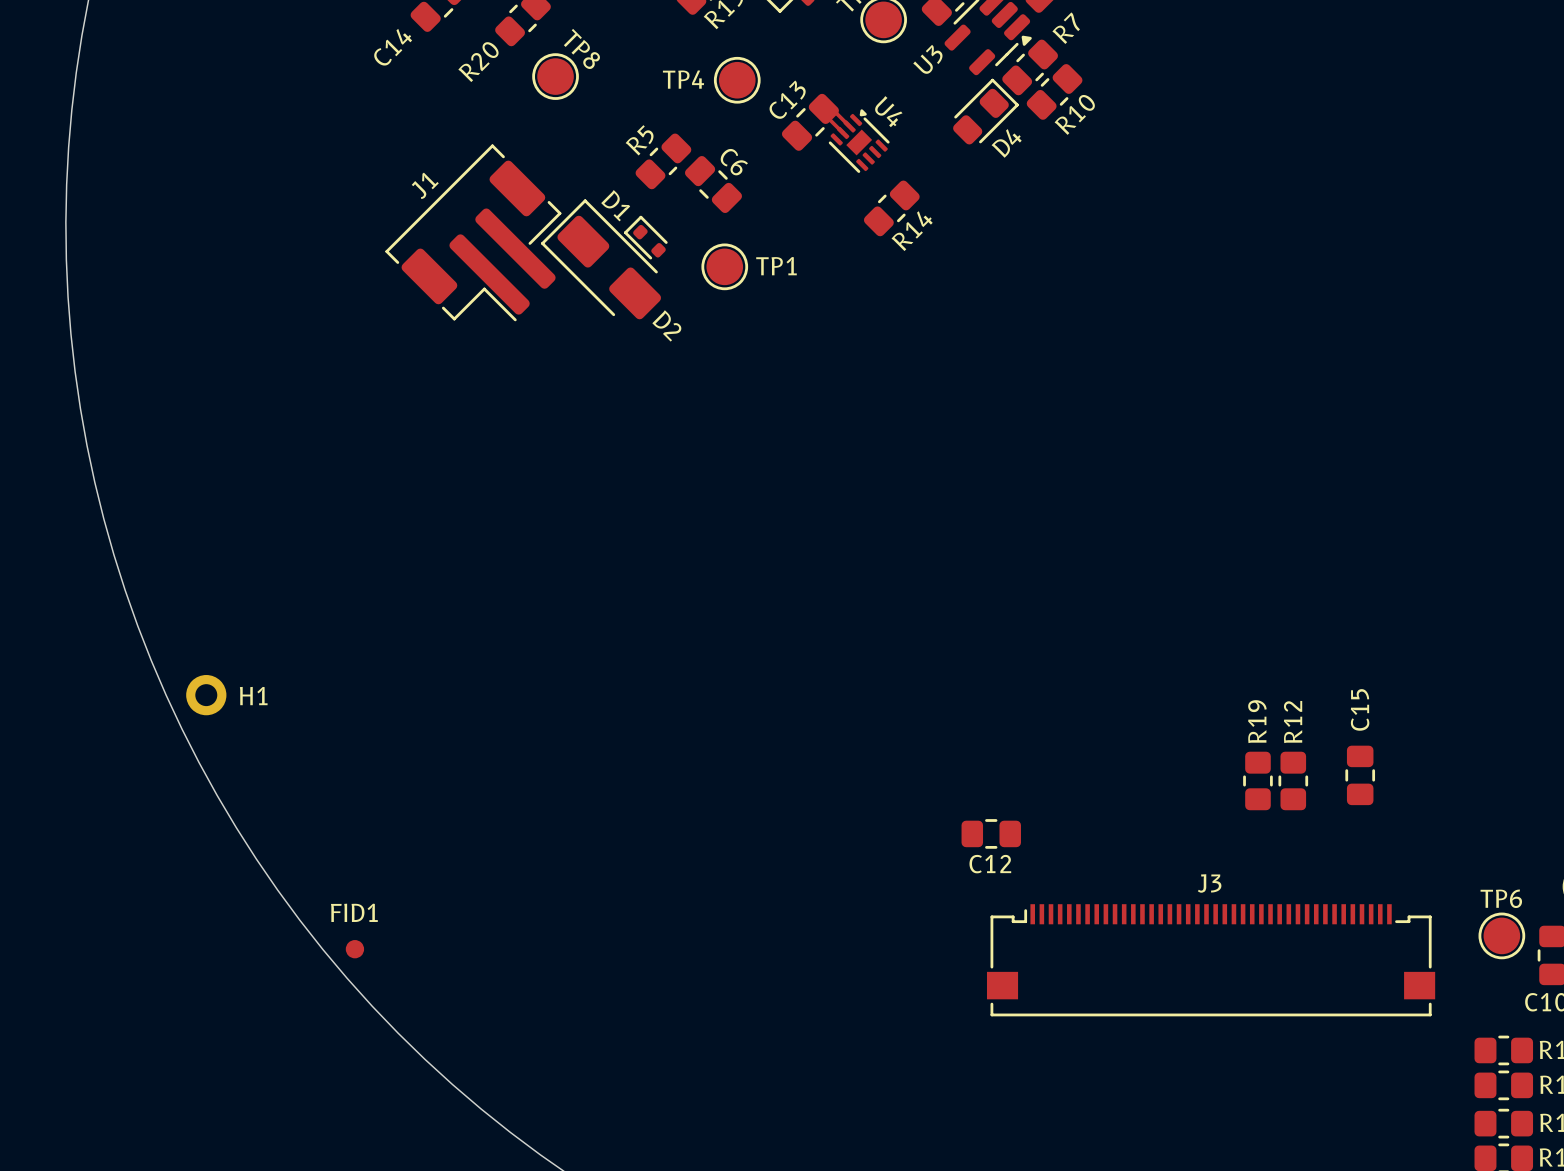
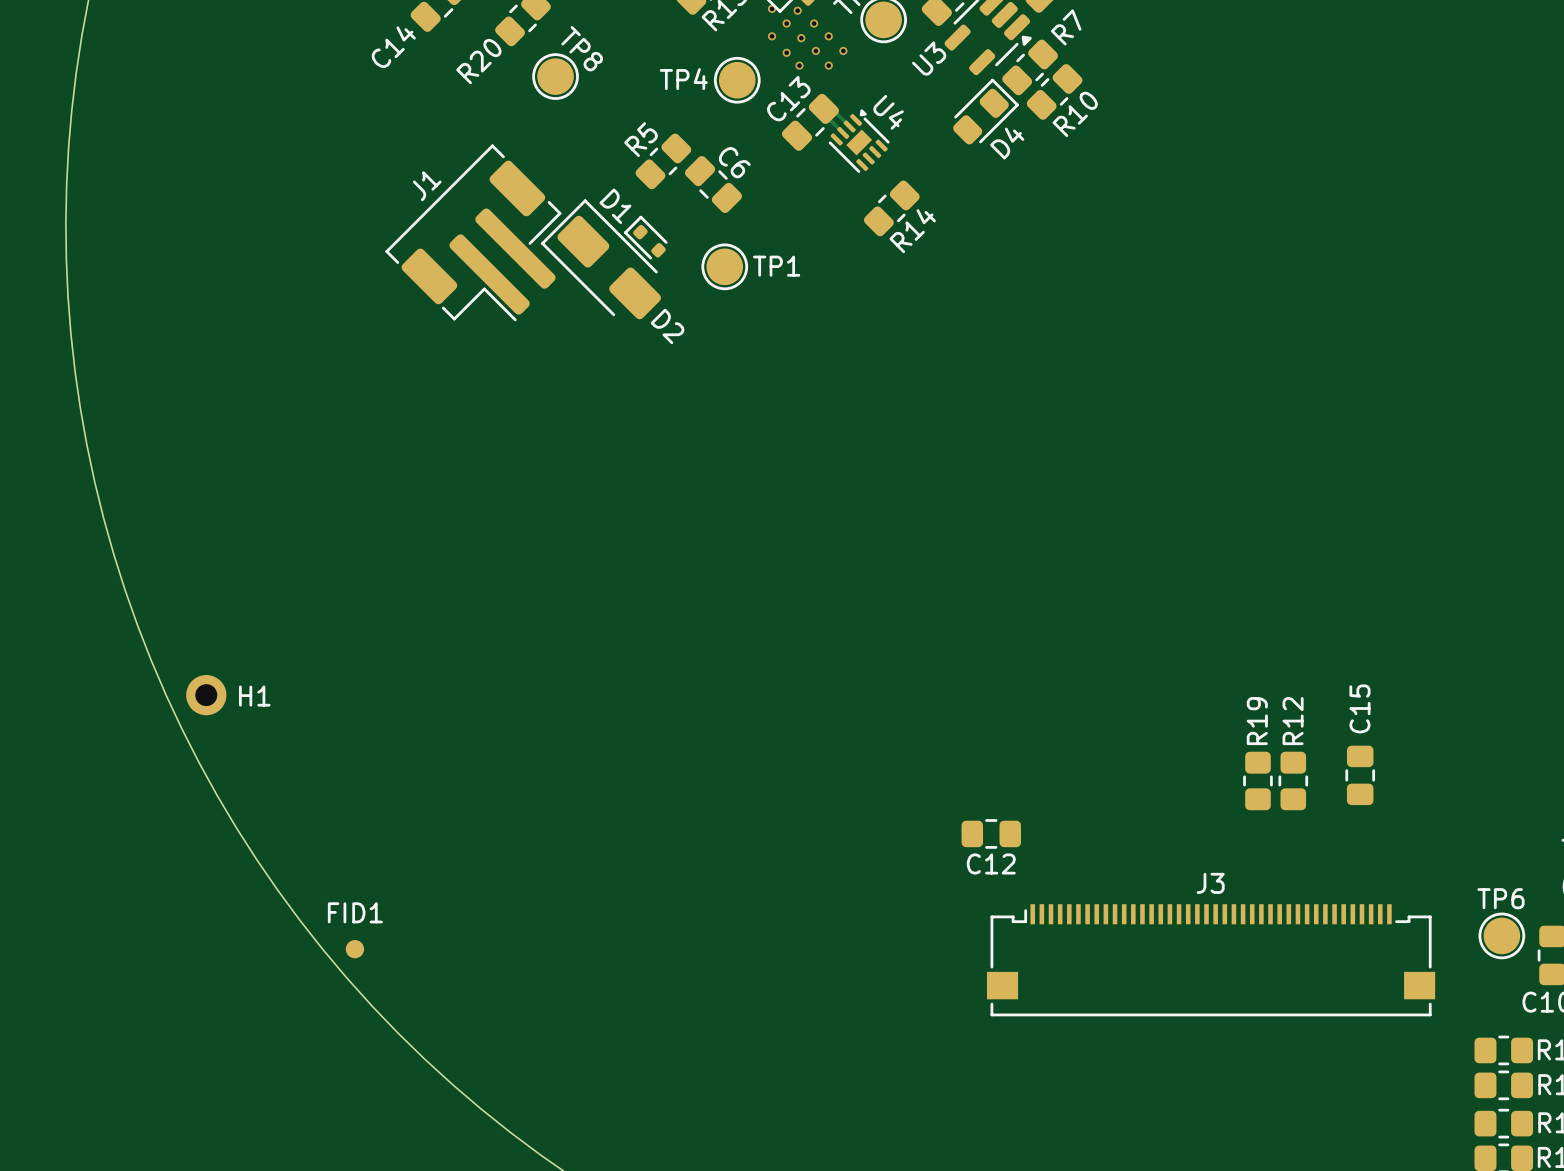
via: none -> (772, 8)
via: none -> (797, 10)
via: none -> (786, 23)
via: none -> (814, 23)
via: none -> (772, 36)
via: none -> (828, 36)
via: none -> (801, 38)
via: none -> (815, 50)
via: none -> (843, 50)
via: none -> (786, 52)
via: none -> (799, 65)
via: none -> (828, 65)

